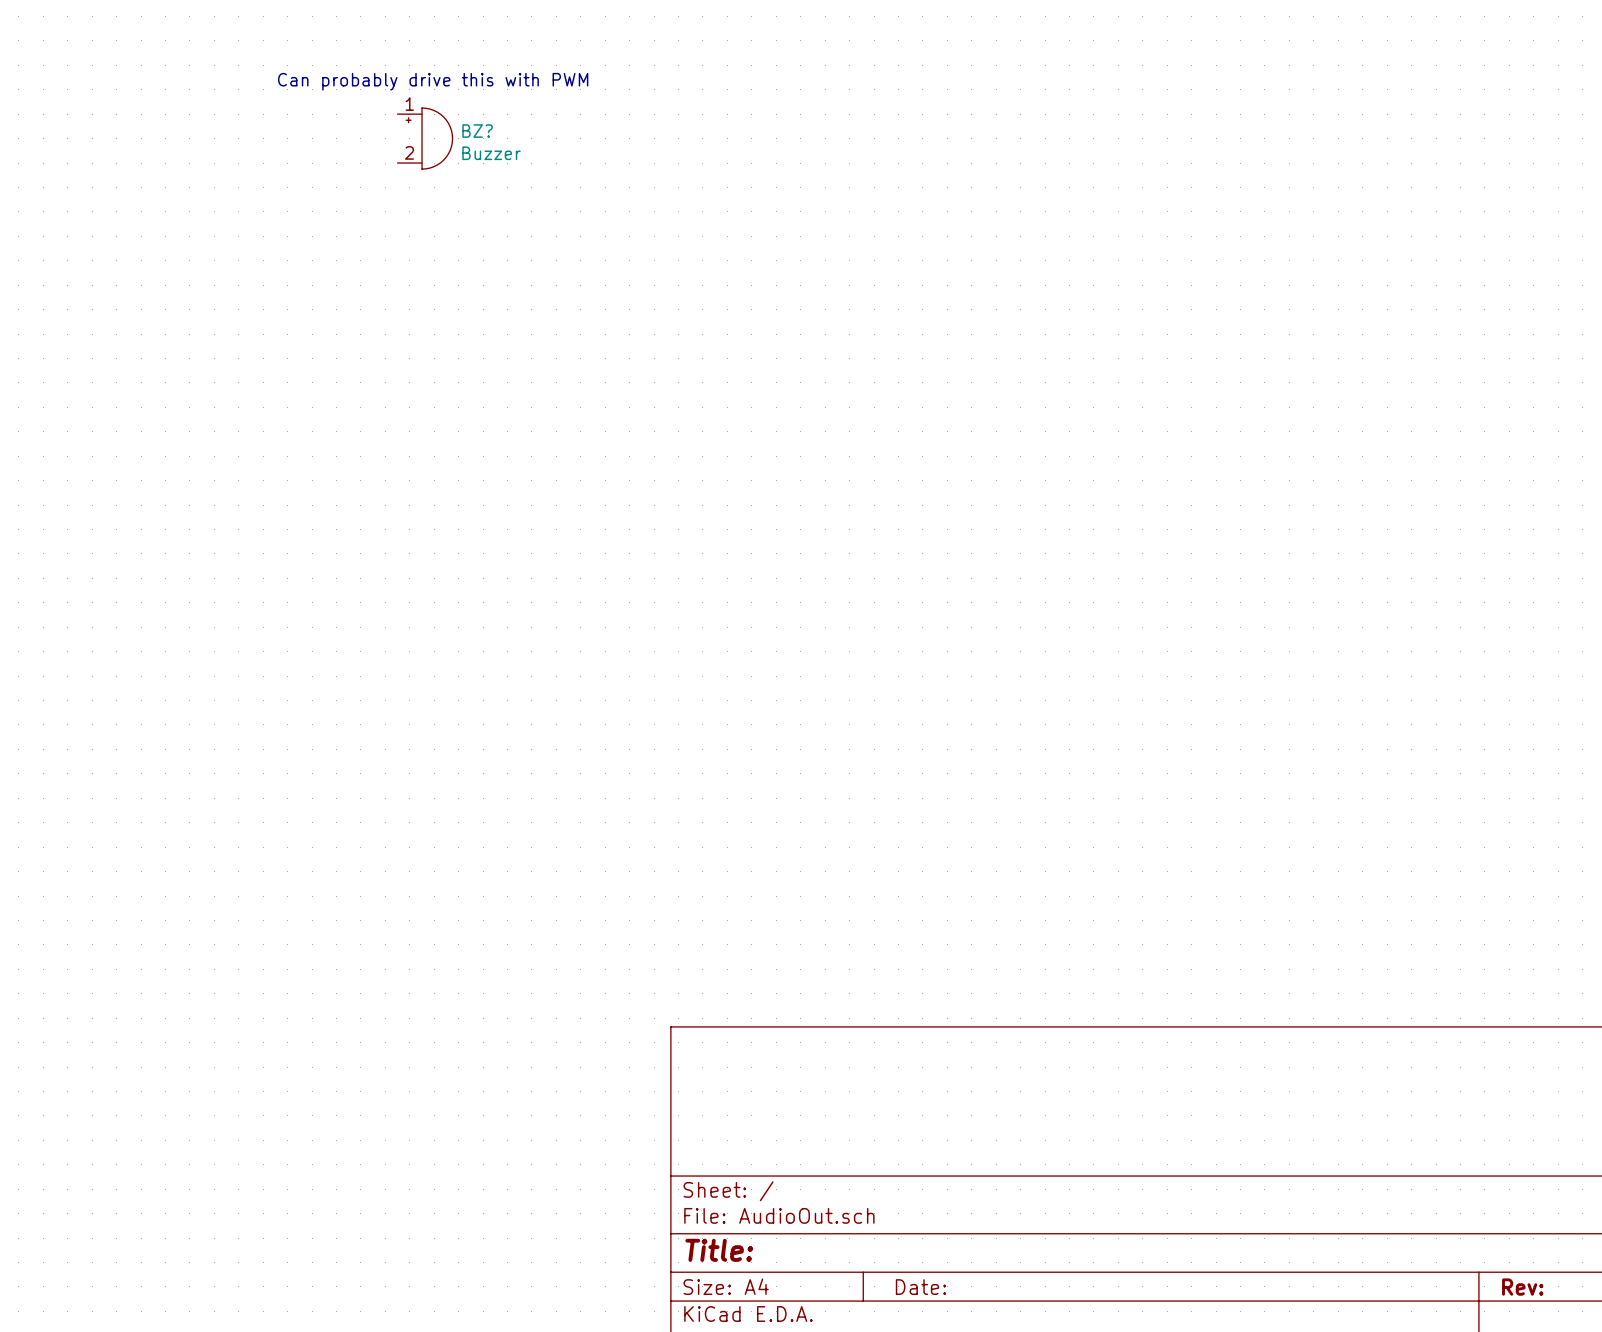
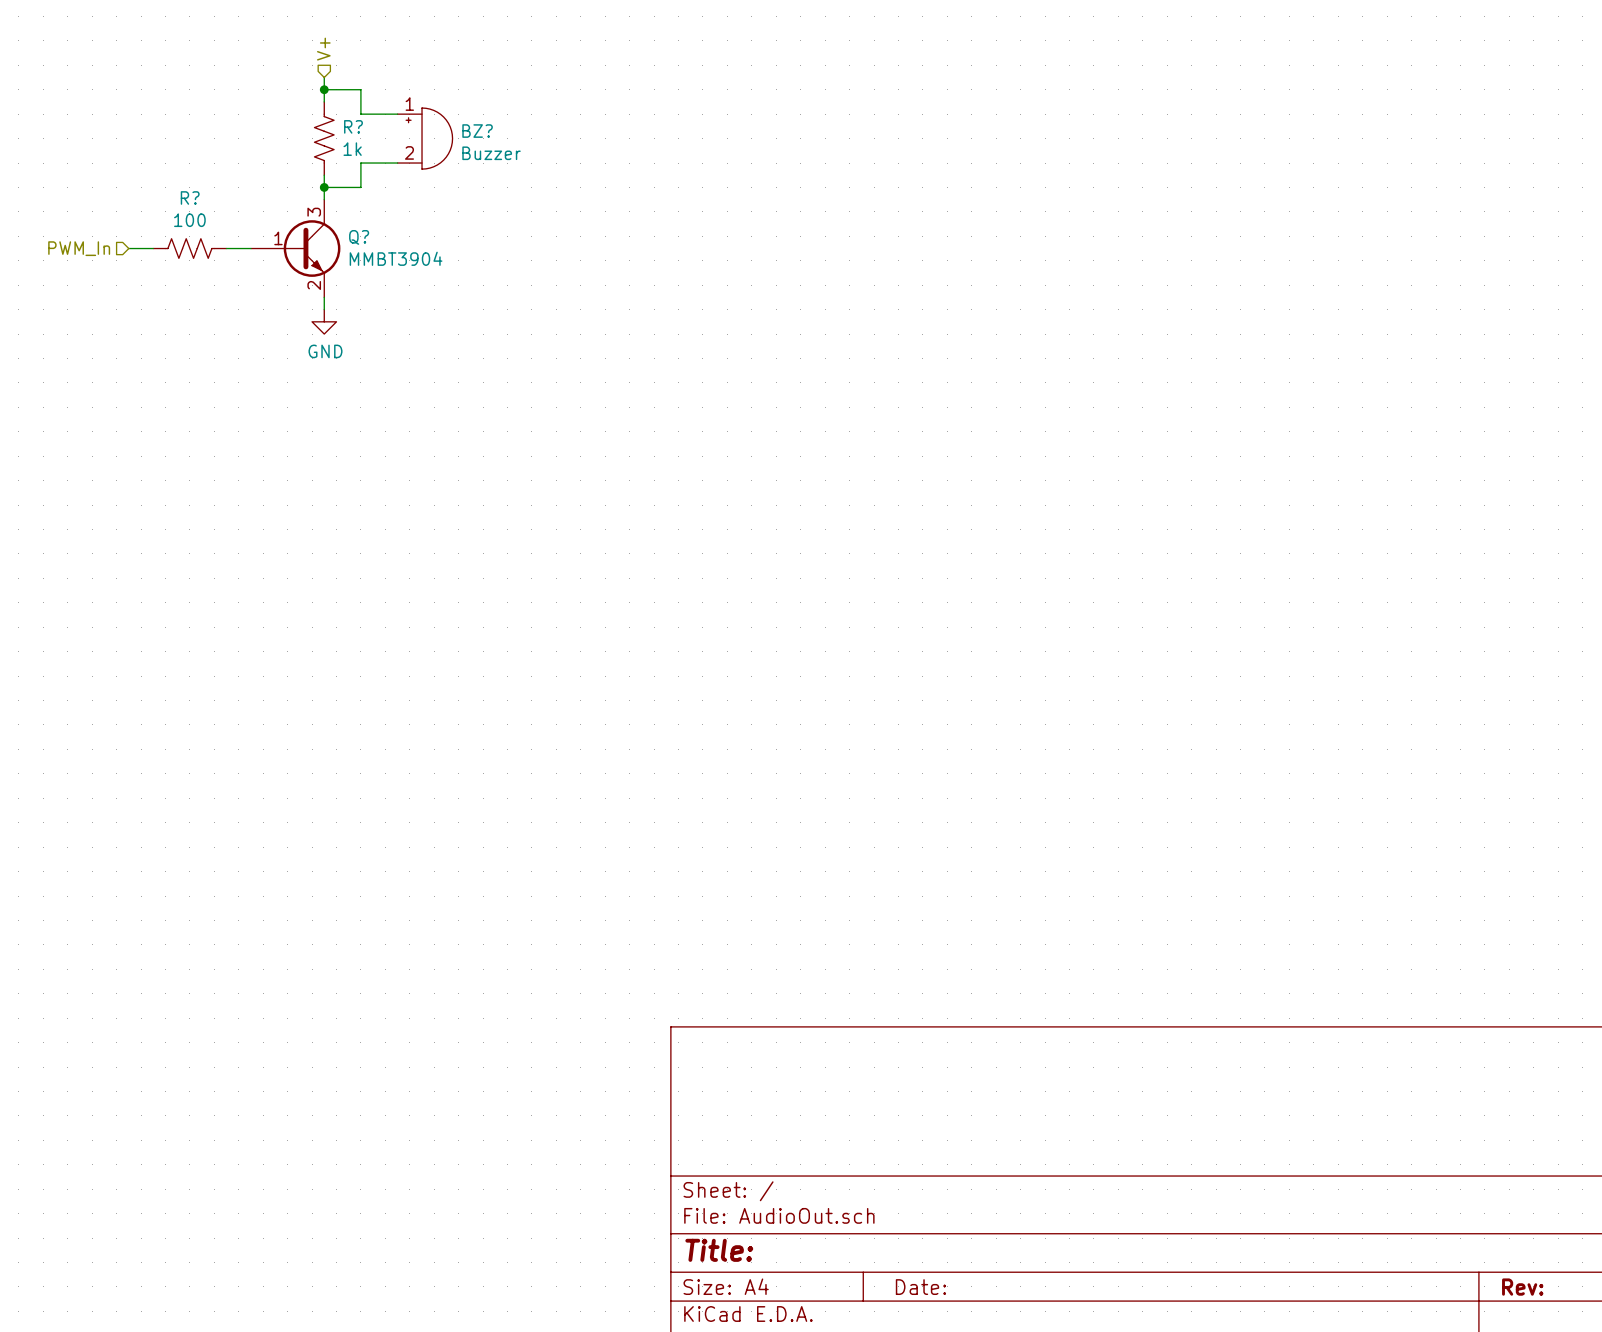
hierarchical label: none -> V+ (323, 49)
wire: none -> (324, 77) (324, 101)
text: Can probably drive this with PWM (433, 81) -> none
wire: none -> (324, 89) (360, 89) (360, 114) (397, 114)
junction: none -> (324, 89)
R?: none -> 1k (324, 138)
wire: none -> (397, 163) (360, 163) (360, 187) (324, 187)
wire: none -> (324, 175) (324, 199)
junction: none -> (324, 187)
hierarchical label: none -> PWM_In (79, 248)
wire: none -> (128, 248) (153, 248)
R?: none -> 100 (189, 248)
wire: none -> (226, 248) (250, 248)
Q?: none -> MMBT3904 (295, 248)
wire: none -> (324, 297) (324, 309)
power symbol: none -> GND (324, 321)

